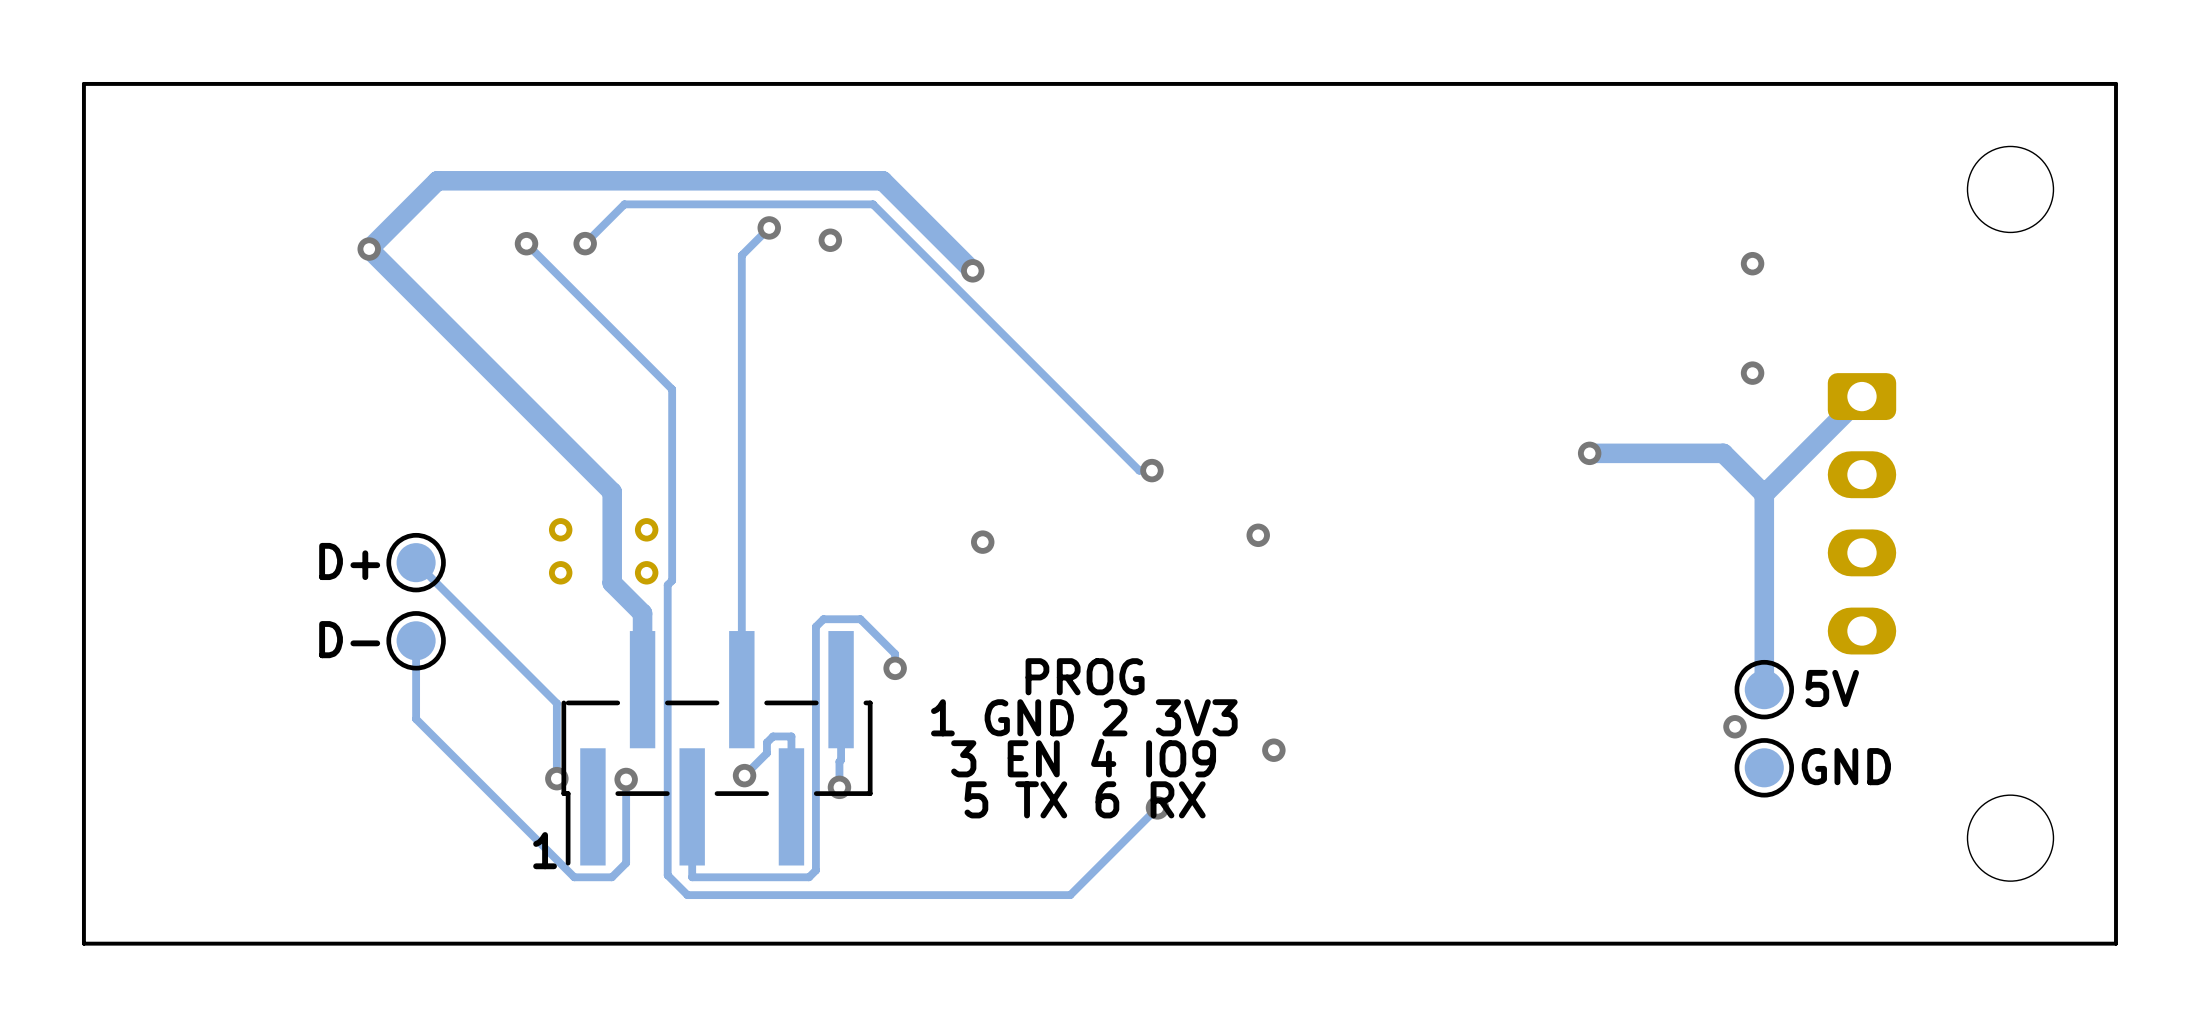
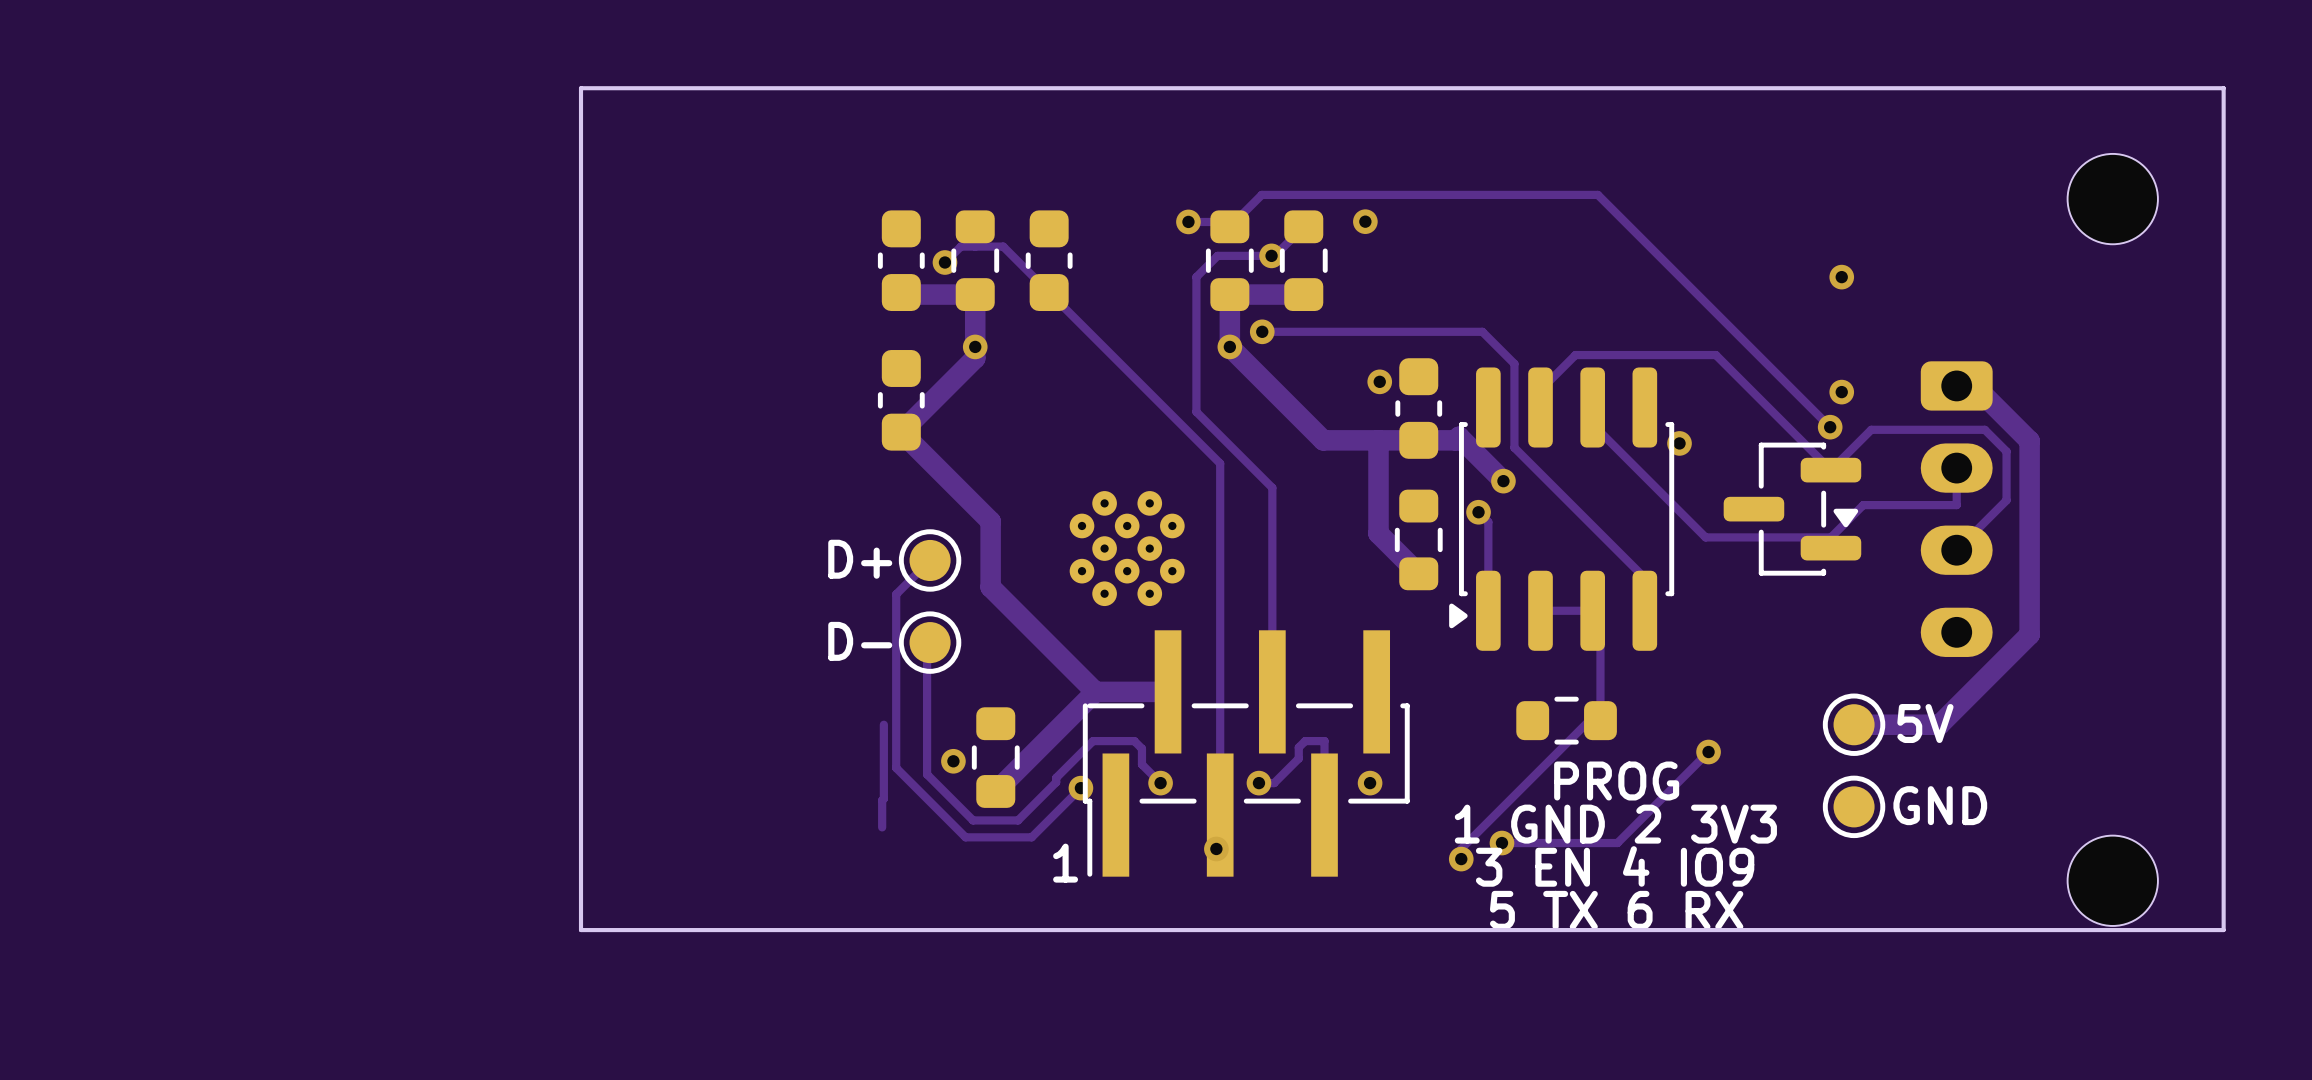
board edge: (552, 83) (83, 83) (83, 943) (2115, 943) (2115, 885) -> (581, 88) (581, 930) (2223, 930)
via: none -> (1365, 221)
track: none -> (1188, 221) (1225, 221) (1229, 226) (1261, 194) (1597, 194) (1830, 427)
via: none -> (1188, 221)
track: none -> (1303, 226) (1274, 255) (1217, 255) (1196, 277) (1196, 411) (1272, 487) (1272, 691)
track: (769, 227) (741, 255) (741, 689) -> none
via: (769, 227) -> none
via: (830, 240) -> none
track: (526, 243) (672, 389) (672, 580) (667, 585) (667, 875) (687, 895) (1070, 895) (1157, 807) -> none
via: (526, 243) -> none
track: (585, 243) (624, 204) (873, 204) (1139, 470) (1151, 470) -> none
via: (585, 243) -> none
via: none -> (1271, 255)
part: none -> (901, 260)
part: none -> (975, 260)
part: none -> (1049, 260)
part: none -> (1229, 260)
part: none -> (1303, 260)
via: (369, 249) -> none
track: none -> (944, 262) (960, 246) (1003, 246) (1220, 463) (1220, 815)
via: none -> (944, 262)
track: (972, 270) (882, 180) (437, 180) (369, 249) (612, 492) (612, 583) (642, 613) (642, 689) -> none
via: (972, 270) -> none
track: none -> (901, 292) (903, 294) (975, 294) (975, 358) (901, 432) (990, 521) (990, 587) (1095, 691)
track: none -> (1303, 294) (1229, 294) (1229, 346) (1323, 440) (1455, 440) (1459, 436) (1503, 481)
track: none -> (1262, 331) (1482, 331) (1514, 363) (1514, 447) (1644, 578) (1644, 610)
via: none -> (1262, 331)
via: none -> (975, 346)
via: none -> (1229, 346)
via: none -> (1379, 381)
part: none -> (901, 400)
track: none -> (1540, 407) (1540, 390) (1575, 355) (1715, 355) (1830, 470) (1871, 429) (1984, 429) (2006, 451) (2006, 500) (1956, 550)
track: none -> (1592, 407) (1592, 424) (1705, 537) (1830, 537)
part: none -> (1418, 408)
track: (1861, 396) (1764, 494) -> none
via: none -> (1830, 427)
track: none -> (1378, 440) (1378, 533) (1418, 573)
track: none -> (1956, 468) (1956, 505) (1863, 505) (1830, 537)
track: (1589, 453) (1723, 453) (1764, 494) -> none
via position: (1589, 453) -> (1679, 443)
via: none -> (1503, 481)
via: (1151, 470) -> none
part: none -> (1561, 509)
part: none -> (1792, 509)
track: none -> (1478, 512) (1488, 522) (1488, 610)
via: none -> (1478, 512)
track: (1764, 494) (1764, 689) -> (1956, 385) (1974, 385) (2029, 441) (2029, 634) (1939, 724) (1854, 724)
part: none -> (1418, 539)
part position: (1861, 513) -> (1956, 509)
part: none -> (1127, 548)
track: none -> (930, 560) (896, 594) (896, 767) (965, 837) (1031, 837) (1080, 788)
part: none -> (930, 560)
via: (1258, 535) -> none
via: (982, 542) -> none
part: (603, 551) -> none
text position: D+ (349, 561) -> D+ (860, 559)
track: (416, 562) (556, 703) (556, 778) -> none
part: (416, 562) -> none
track: none -> (1540, 610) (1592, 610) (1600, 618) (1600, 720) (1589, 720) (1461, 848) (1461, 859)
track: none -> (930, 642) (927, 645) (927, 774) (973, 820) (1018, 820) (1056, 782) (1056, 777) (1093, 741) (1134, 741) (1141, 748) (1141, 764) (1160, 783)
part: none -> (930, 642)
text position: D- (349, 639) -> D- (860, 641)
track: (416, 640) (416, 719) (574, 877) (611, 877) (626, 863) (626, 779) -> none
part: (416, 640) -> none
track: none -> (1095, 691) (995, 791)
track: none -> (1168, 691) (1095, 691)
track: (895, 668) (895, 653) (860, 619) (823, 619) (815, 626) (815, 870) (809, 877) (692, 877) (692, 806) -> none
via: (895, 668) -> none
text position: PROG (1085, 676) -> PROG (1616, 781)
part: none -> (1566, 720)
track: none -> (1708, 752) (1617, 843) (1501, 843)
text position: 1 GND 2 3V3 (1084, 717) -> 1 GND 2 3V3 (1615, 824)
part: none -> (995, 757)
via: none -> (953, 761)
via position: (1734, 726) -> (1708, 752)
via: none -> (1160, 783)
track: none -> (1258, 783) (1274, 783) (1298, 758) (1298, 747) (1305, 741) (1324, 741) (1324, 815)
via: none -> (1258, 783)
part position: (717, 748) -> (1246, 753)
via: none -> (1080, 788)
via position: (1273, 750) -> (1370, 783)
text position: 3 EN 4 IO9 (1083, 758) -> 3 EN 4 IO9 (1615, 866)
track: (744, 775) (766, 753) (766, 742) (773, 736) (791, 736) (791, 806) -> none
via: (744, 775) -> none
via: (556, 778) -> none
via: (626, 779) -> none
via: (839, 787) -> none
text position: 5 TX 6 RX (1085, 799) -> 5 TX 6 RX (1616, 910)
via: none -> (1501, 843)
via: none -> (1461, 859)
text position: 1 (545, 850) -> 1 (1065, 863)

